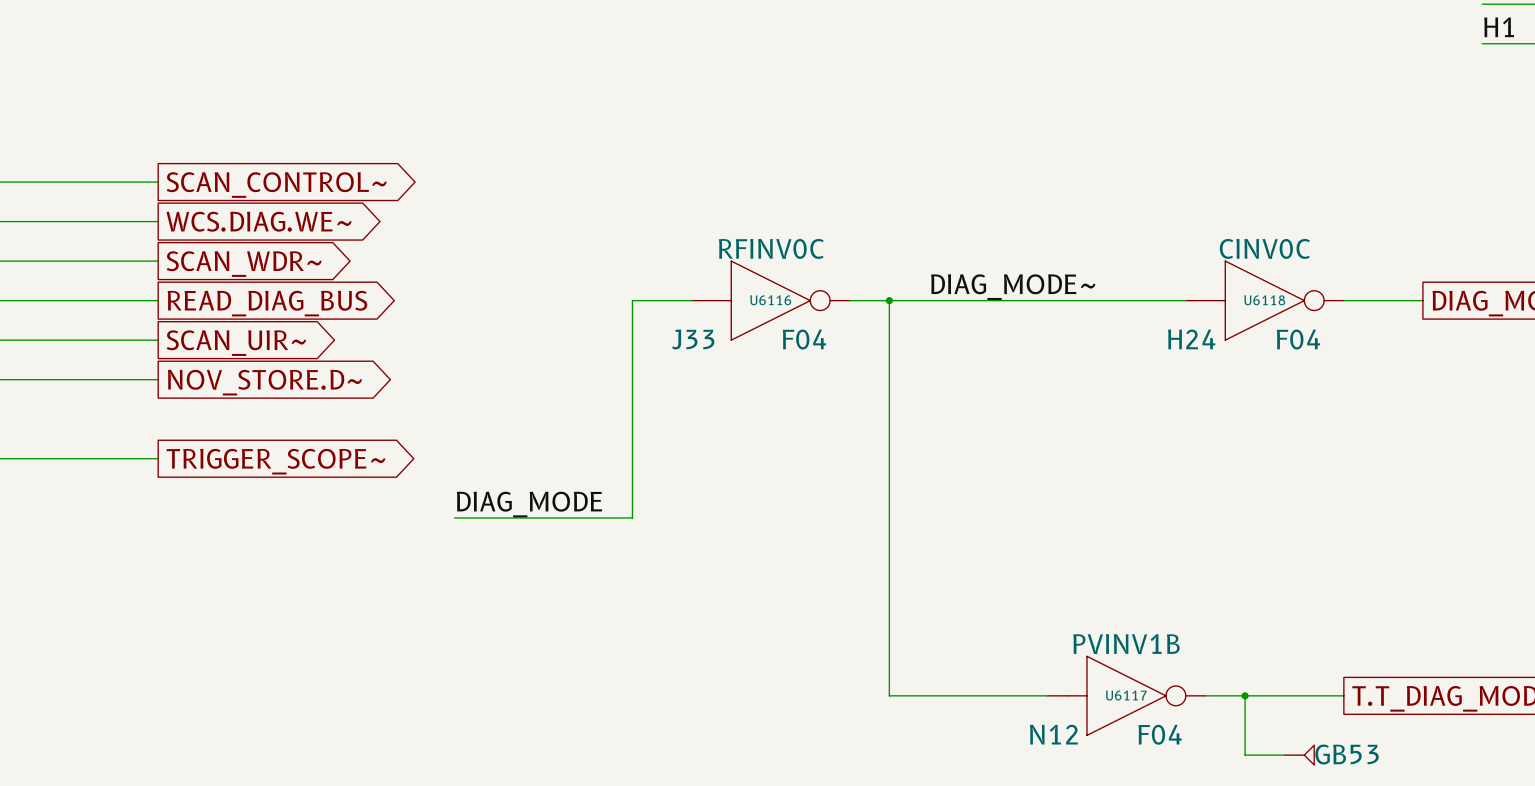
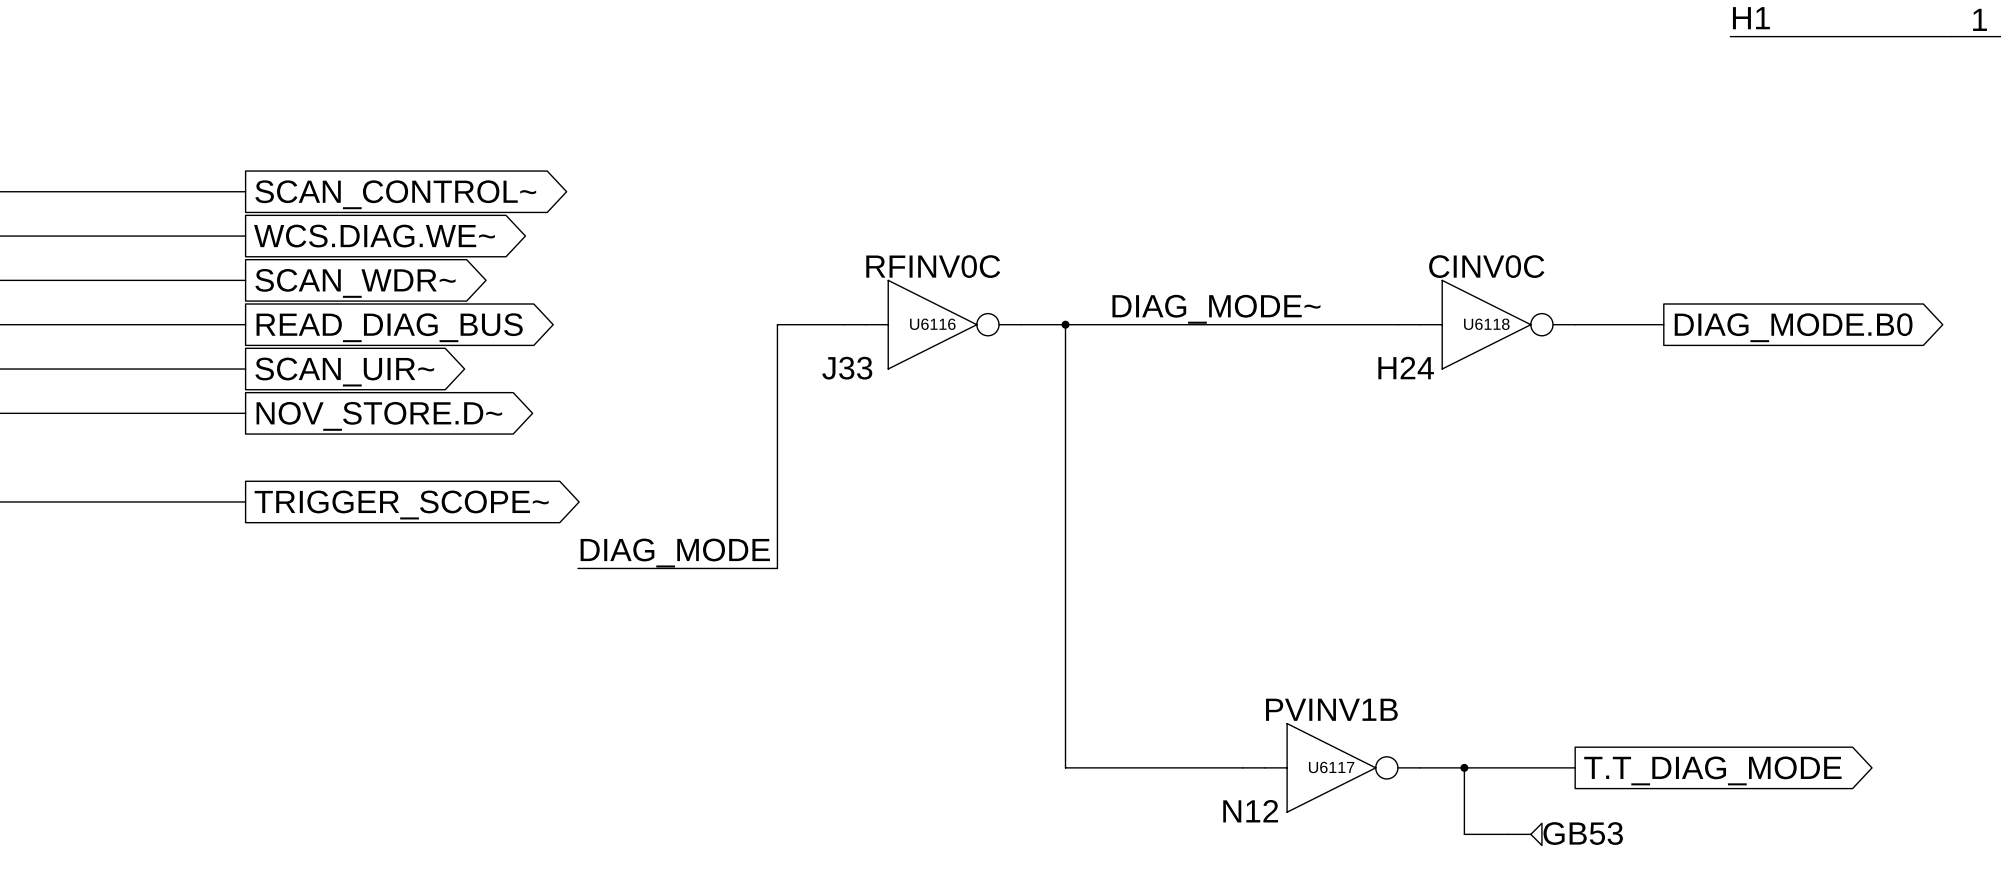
U6116 value: F04 (804, 339) -> none
U6118 value: F04 (1298, 339) -> none
U6117 value: F04 (1160, 734) -> none

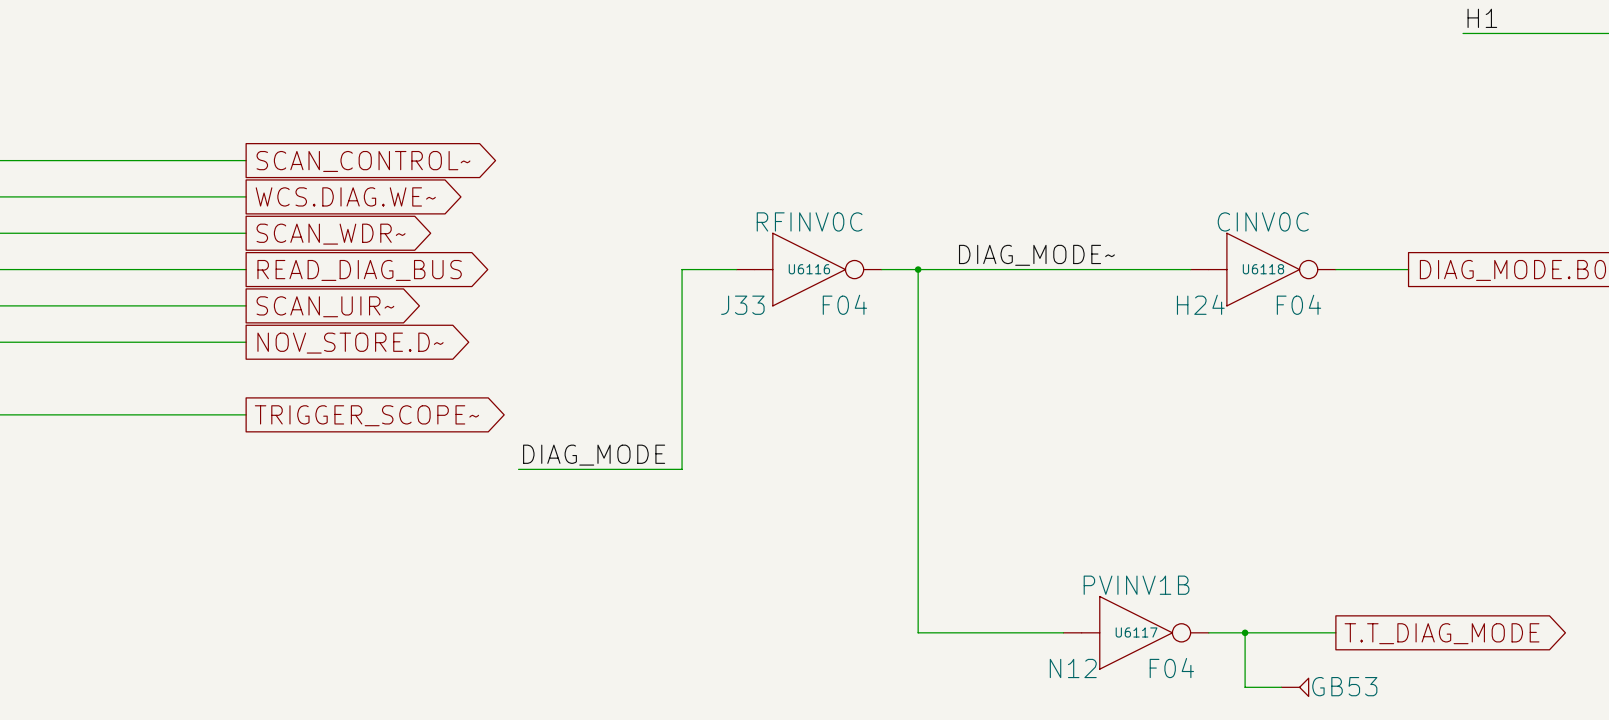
U6116 value: none -> F04 (844, 304)
U6118 value: none -> F04 (1298, 304)
U6117 value: none -> F04 (1171, 668)

